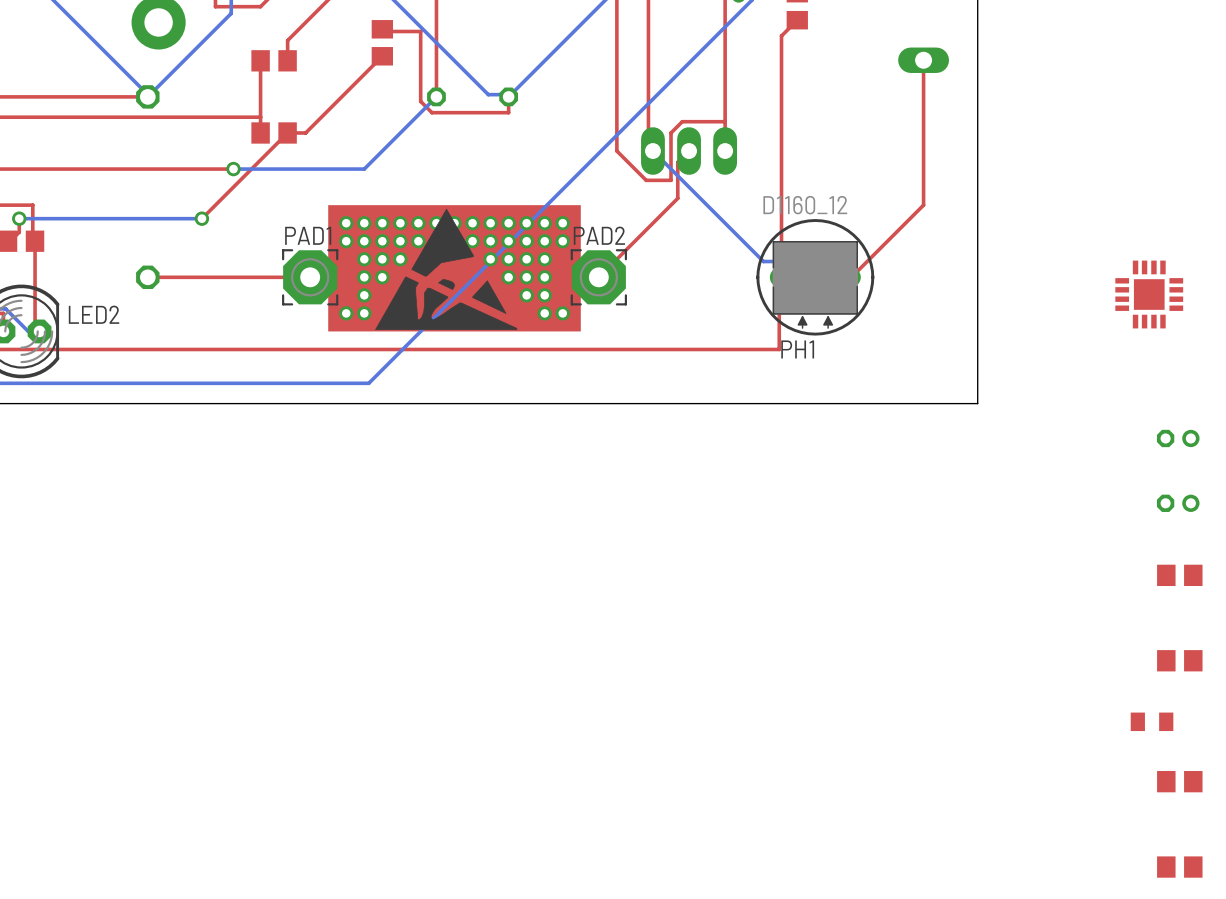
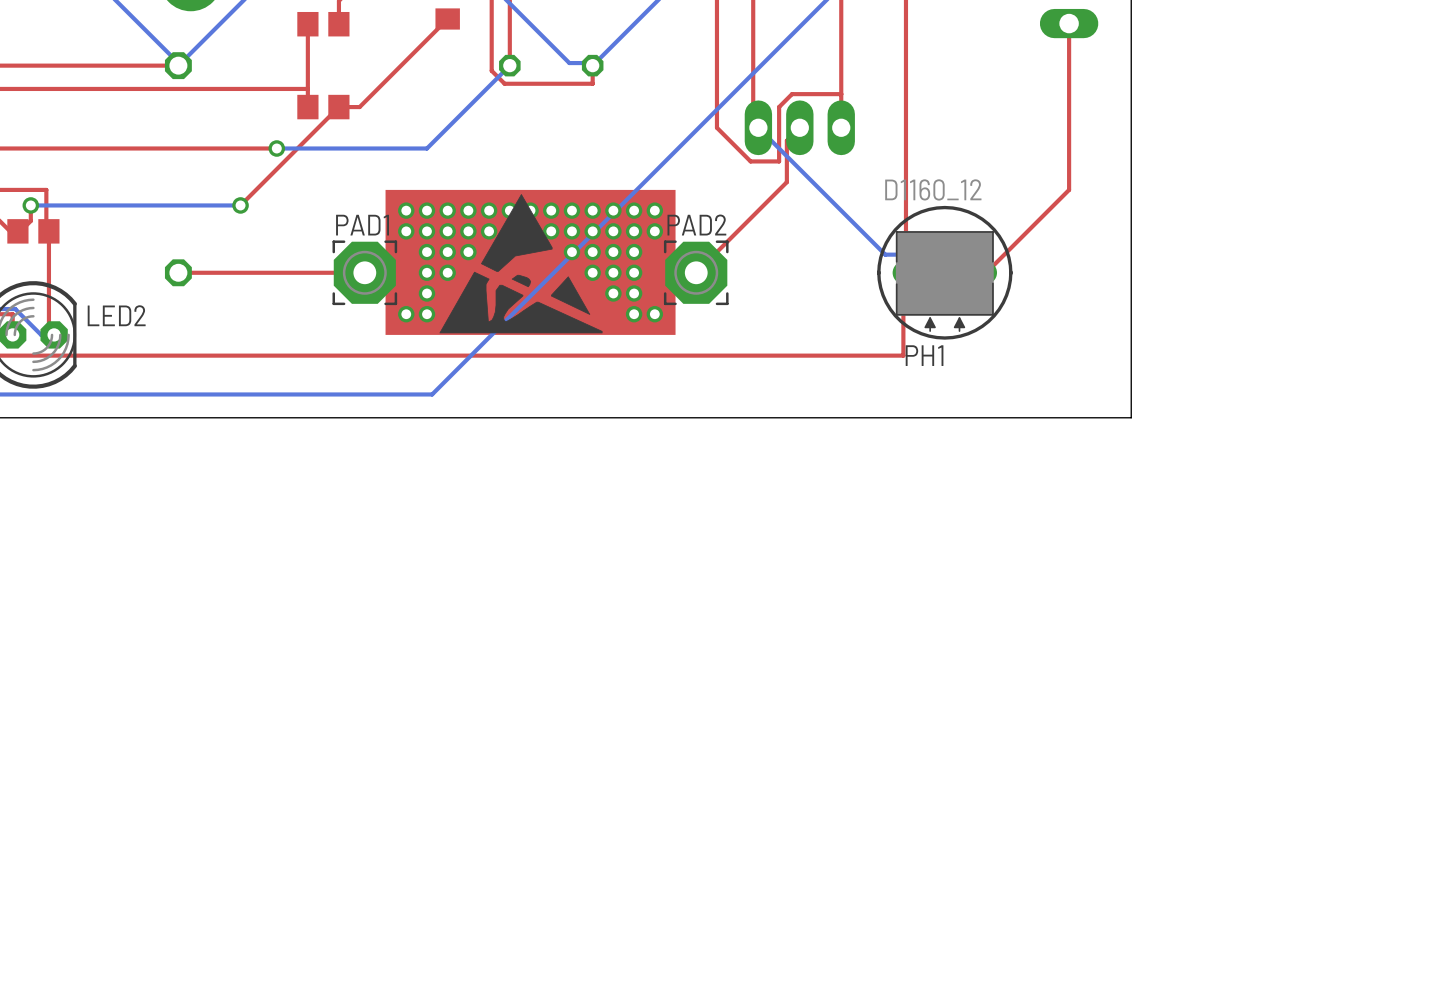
part: (1149, 294) -> none
part: (1178, 438) -> none
part: (1178, 503) -> none
part: (1179, 575) -> none
part: (1179, 660) -> none
part: (1152, 721) -> none
part: (1179, 781) -> none
part: (1179, 867) -> none

